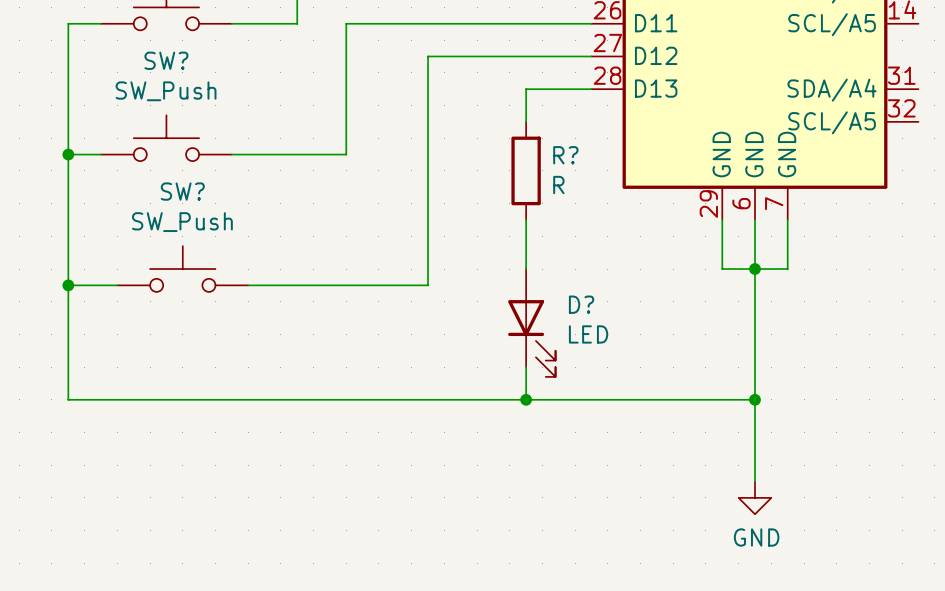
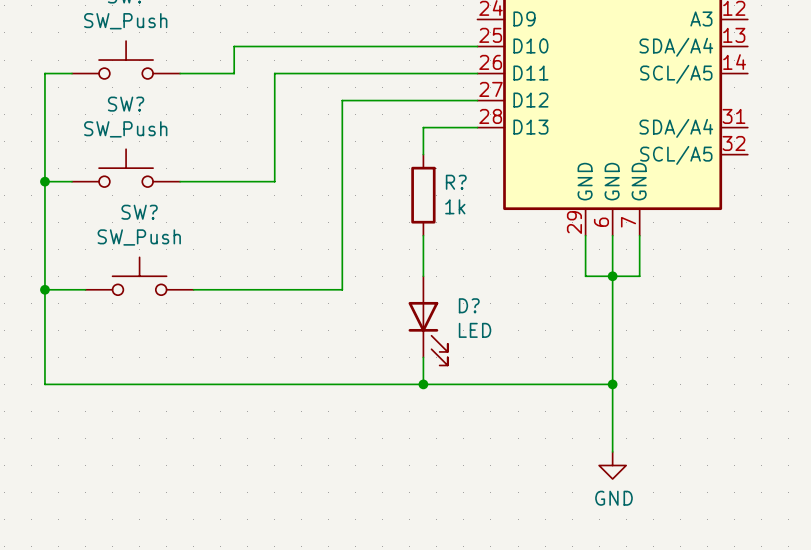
R? value: R (558, 185) -> 1k (455, 206)

